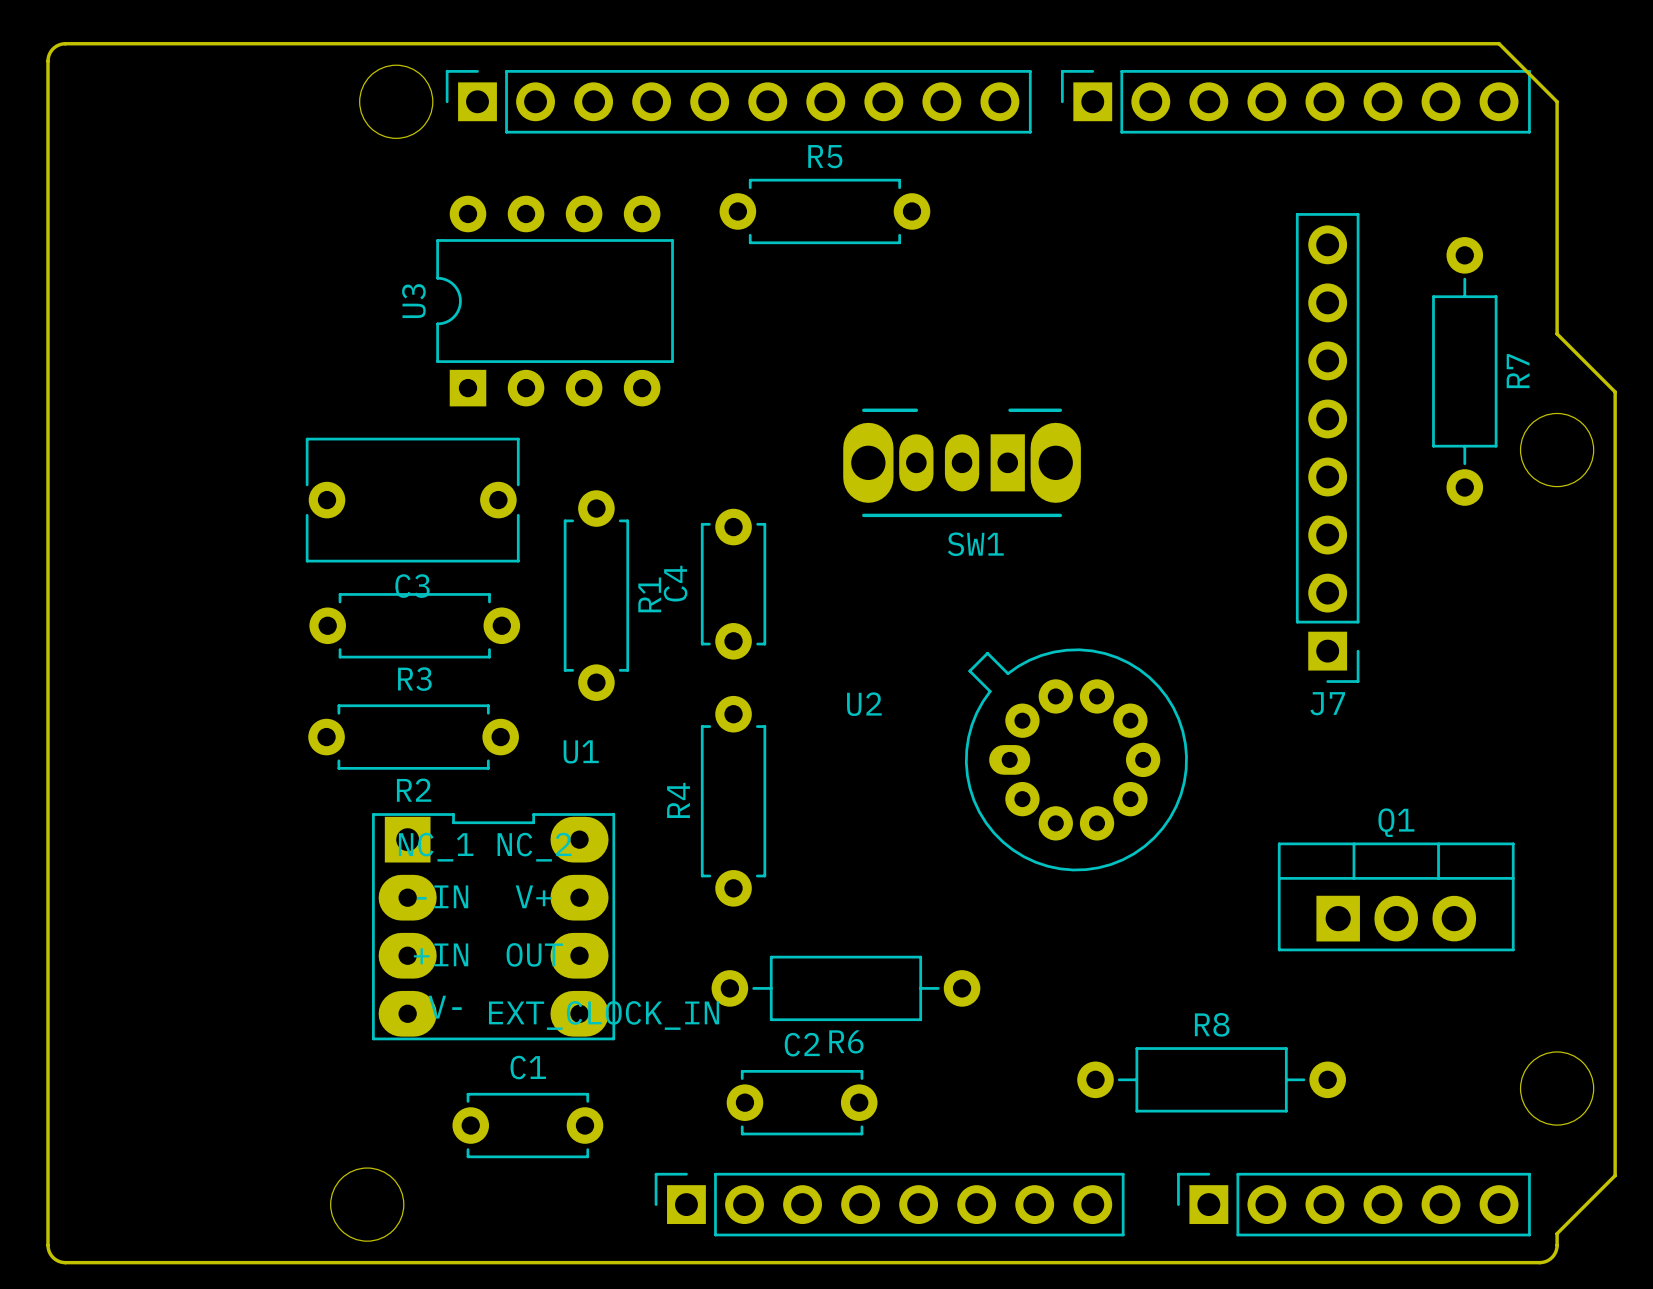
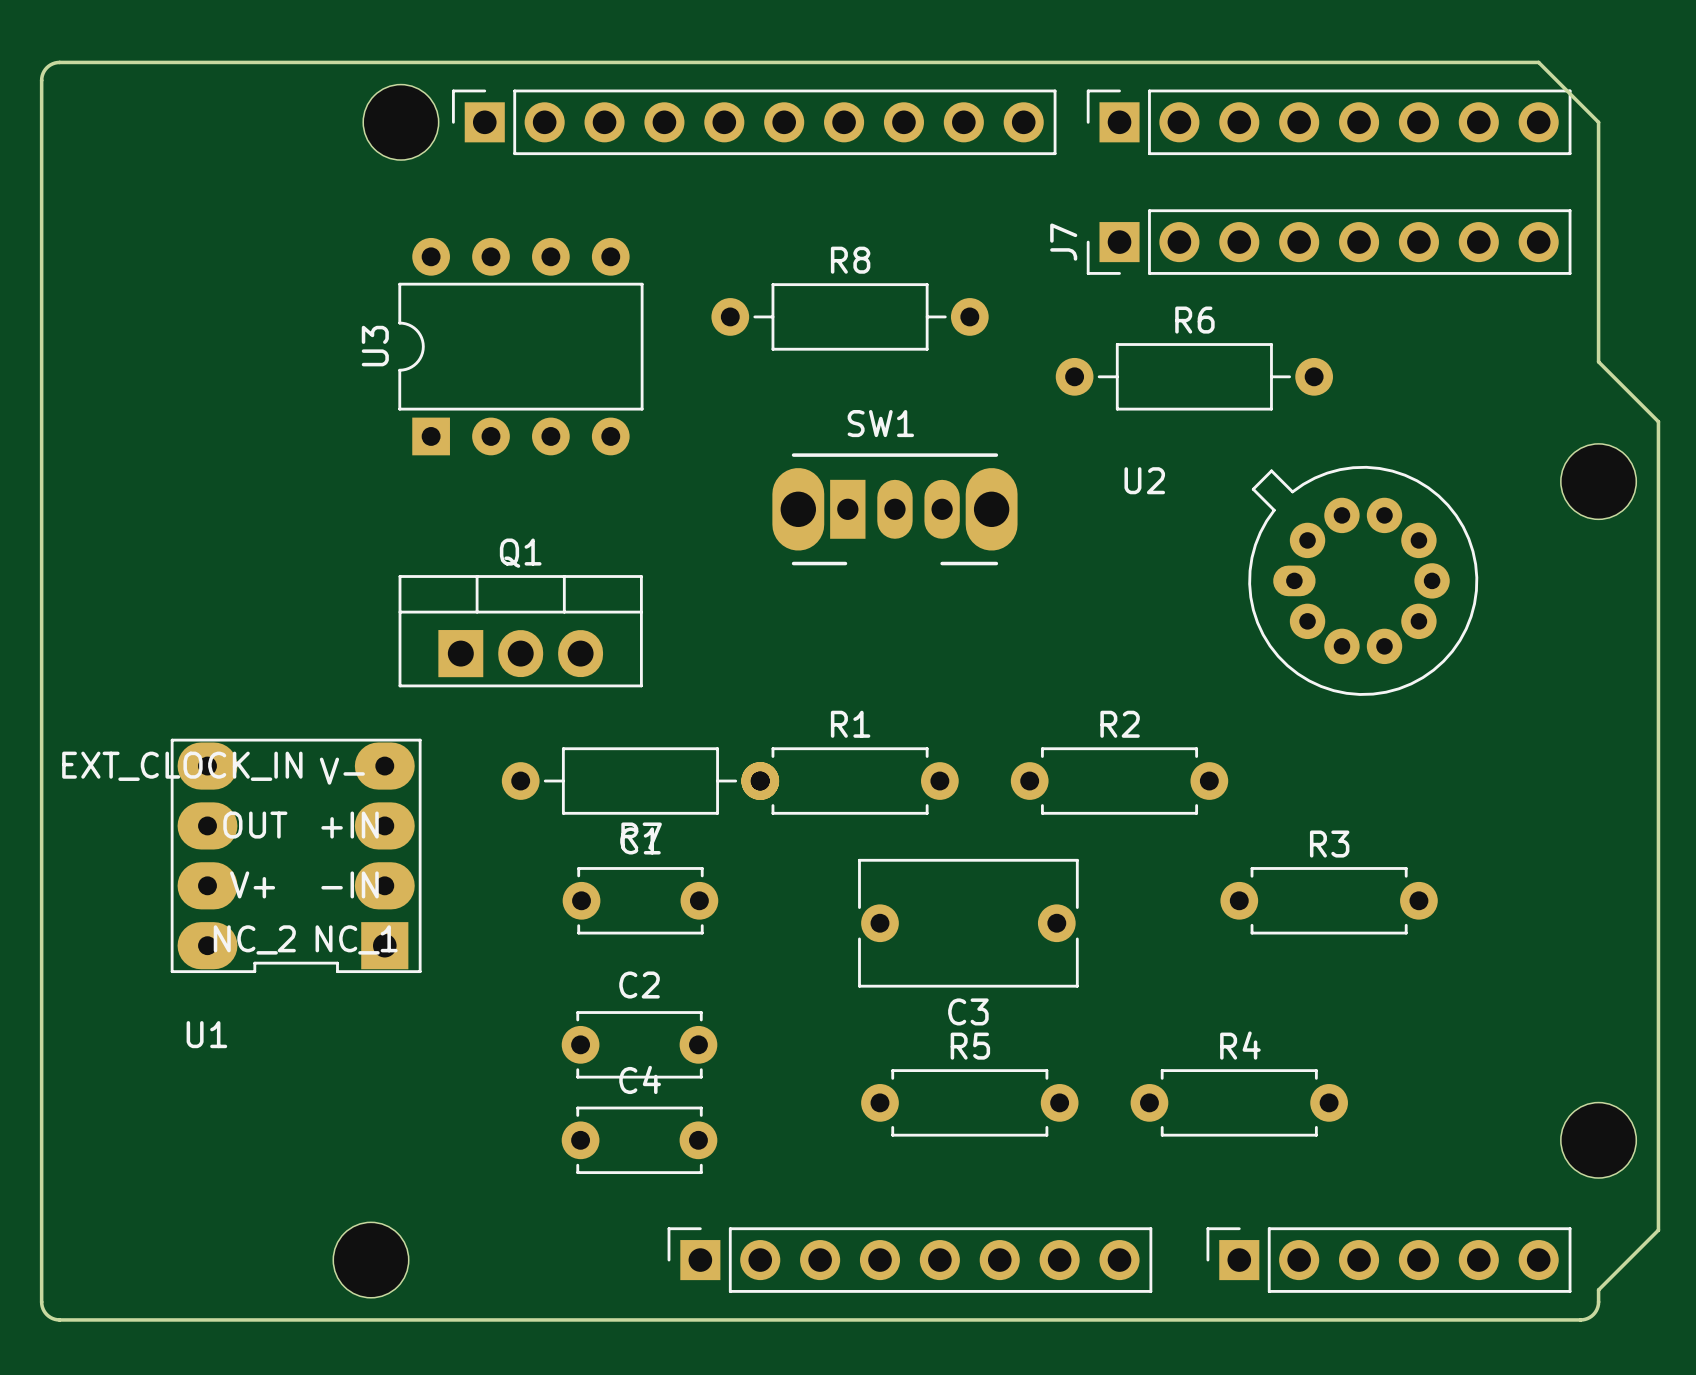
R5 position: (824, 211) -> (969, 1102)
U3 position: (555, 301) -> (520, 346)
R7 rotation: 0° (1464, 371) -> 90° clockwise (640, 781)
R7 position: (1464, 371) -> (640, 781)
J7 rotation: 0° (1327, 447) -> 90° clockwise (1329, 242)
SW1 rotation: 0° (962, 462) -> 180° (894, 509)
C3 position: (412, 500) -> (968, 923)
C4 rotation: 0° (733, 584) -> 90° clockwise (639, 1140)
C4 position: (733, 584) -> (639, 1140)
R1 name position: R1 (649, 594) -> R1 (850, 724)
R1 rotation: 0° (596, 595) -> 90° clockwise (850, 781)
R1 position: (596, 595) -> (850, 781)
R3 position: (414, 625) -> (1329, 900)
R3 name position: R3 (414, 679) -> R3 (1329, 844)
U2 name position: U2 (864, 704) -> U2 (1144, 480)
R2 position: (413, 737) -> (1119, 781)
U2 position: (1076, 759) -> (1363, 580)
R2 name position: R2 (414, 790) -> R2 (1120, 724)
R4 rotation: 0° (733, 801) -> 90° clockwise (1239, 1102)
R4 position: (733, 801) -> (1239, 1102)
Q1 position: (1396, 896) -> (520, 631)
U1 rotation: 0° (493, 926) -> 180° (296, 855)
U1 position: (493, 926) -> (296, 855)
R6 position: (845, 988) -> (1194, 376)
R6 name position: R6 (846, 1041) -> R6 (1194, 320)
R8 position: (1211, 1079) -> (850, 316)
C2 position: (802, 1102) -> (639, 1044)
C1 position: (527, 1125) -> (640, 900)

